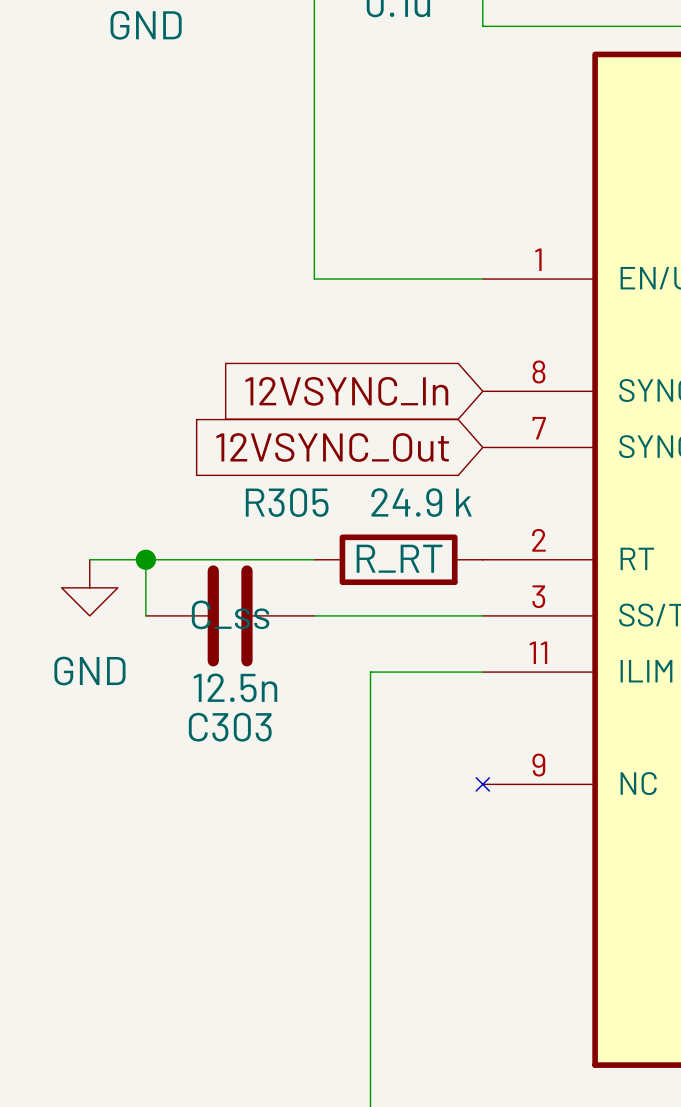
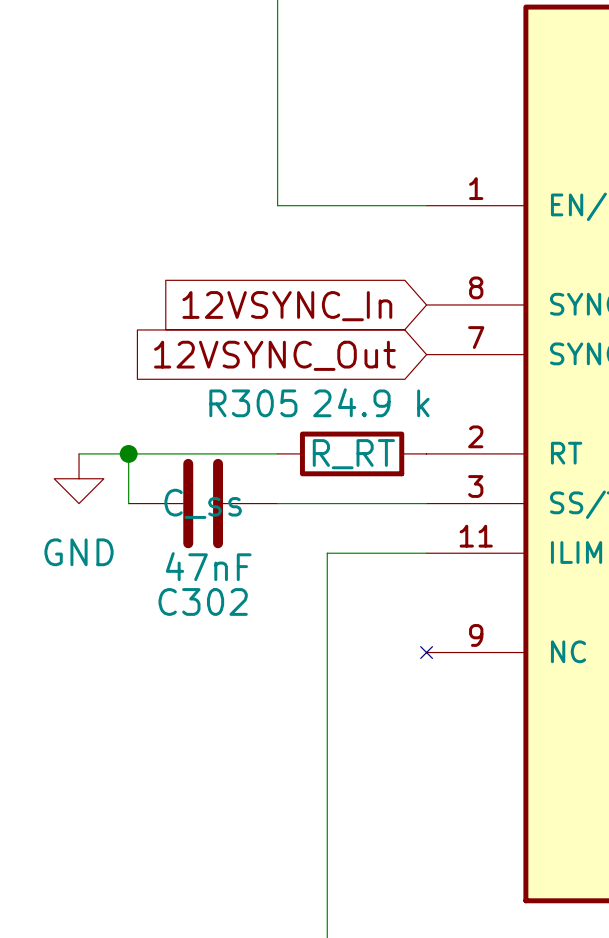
C303 value: 12.5n (235, 687) -> 47nF (208, 566)
C303 name: C303 (230, 727) -> C302 (203, 601)

